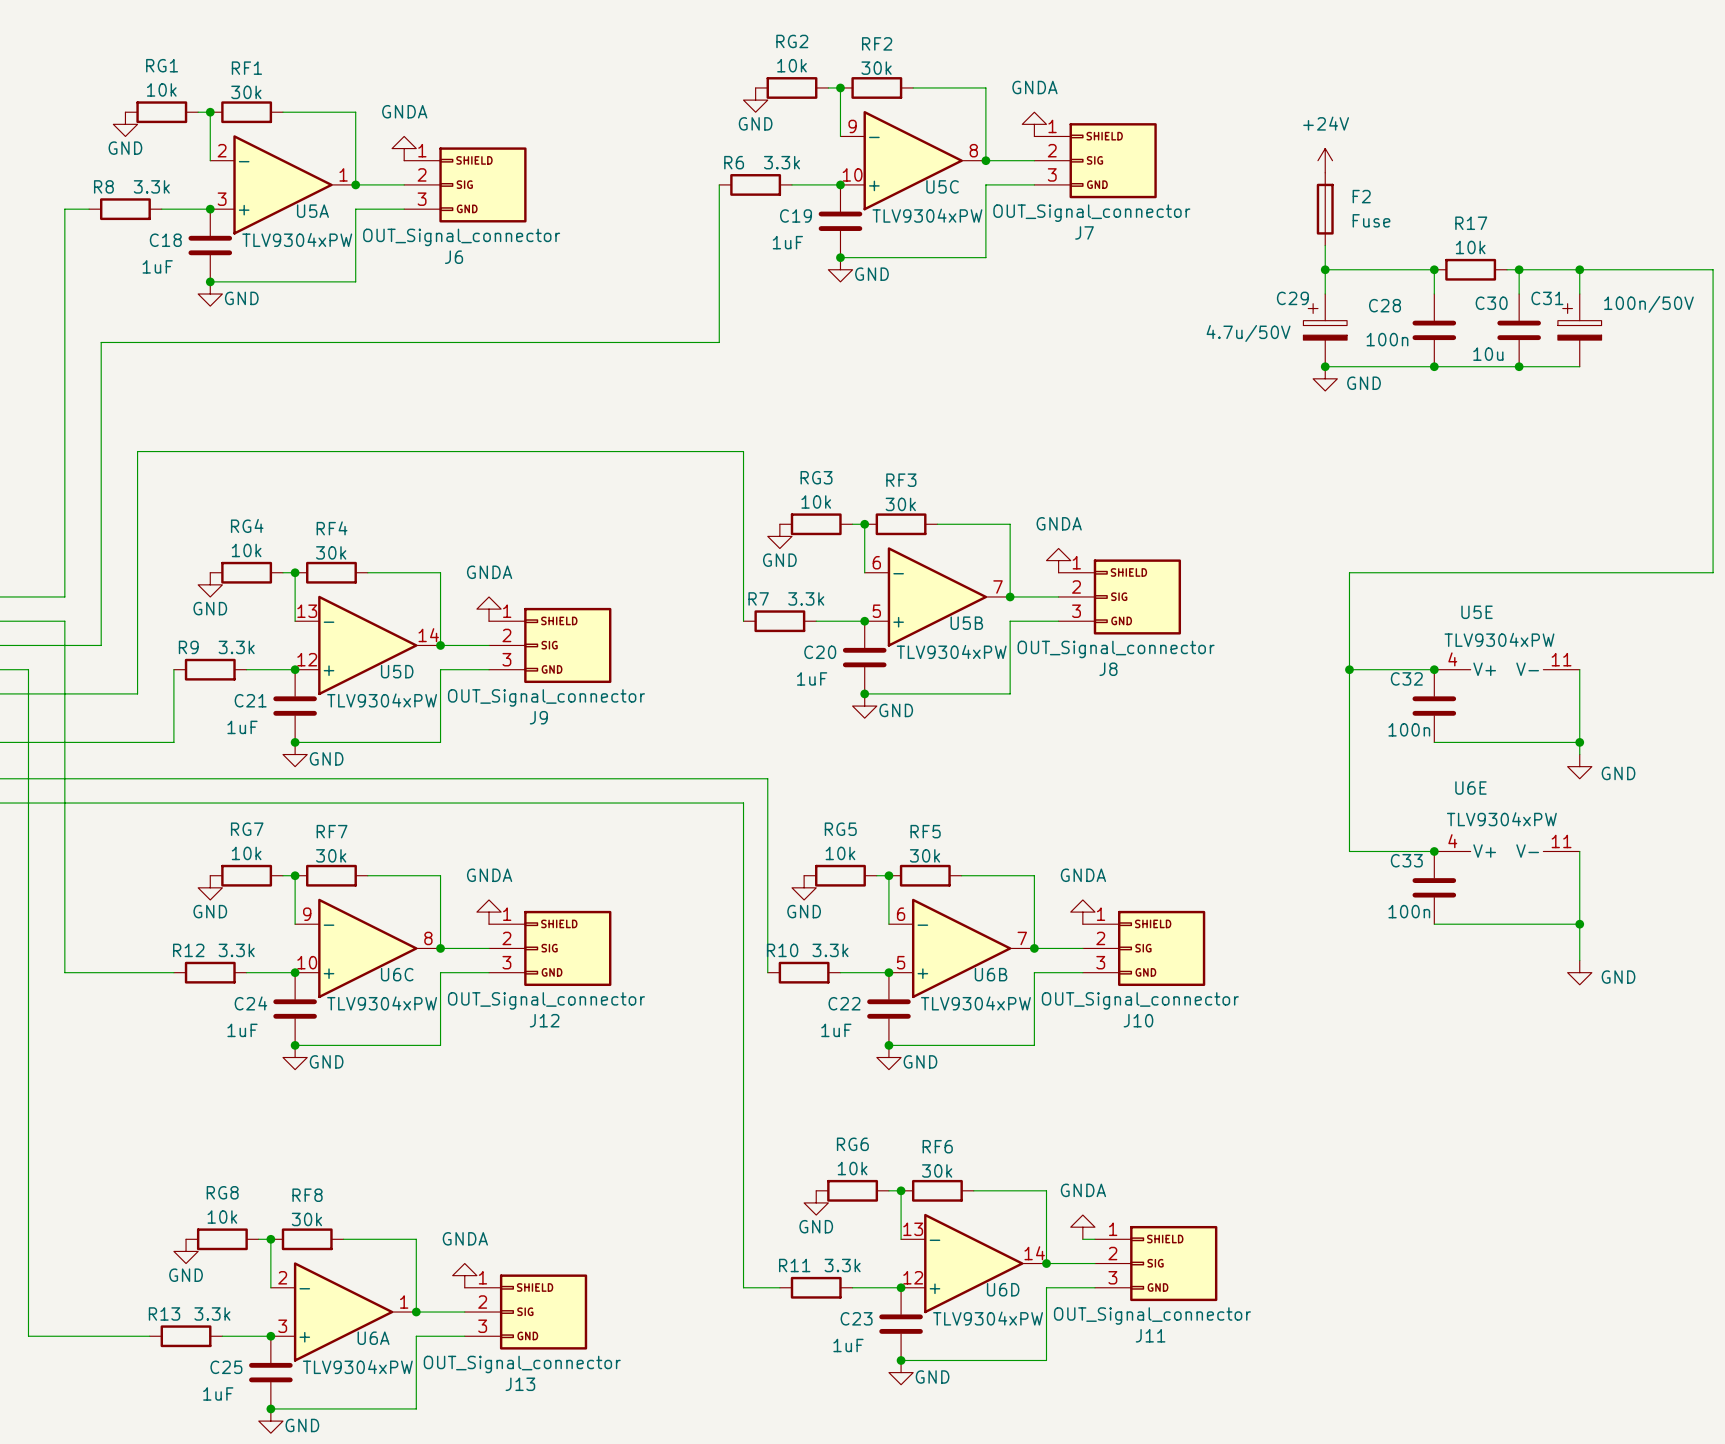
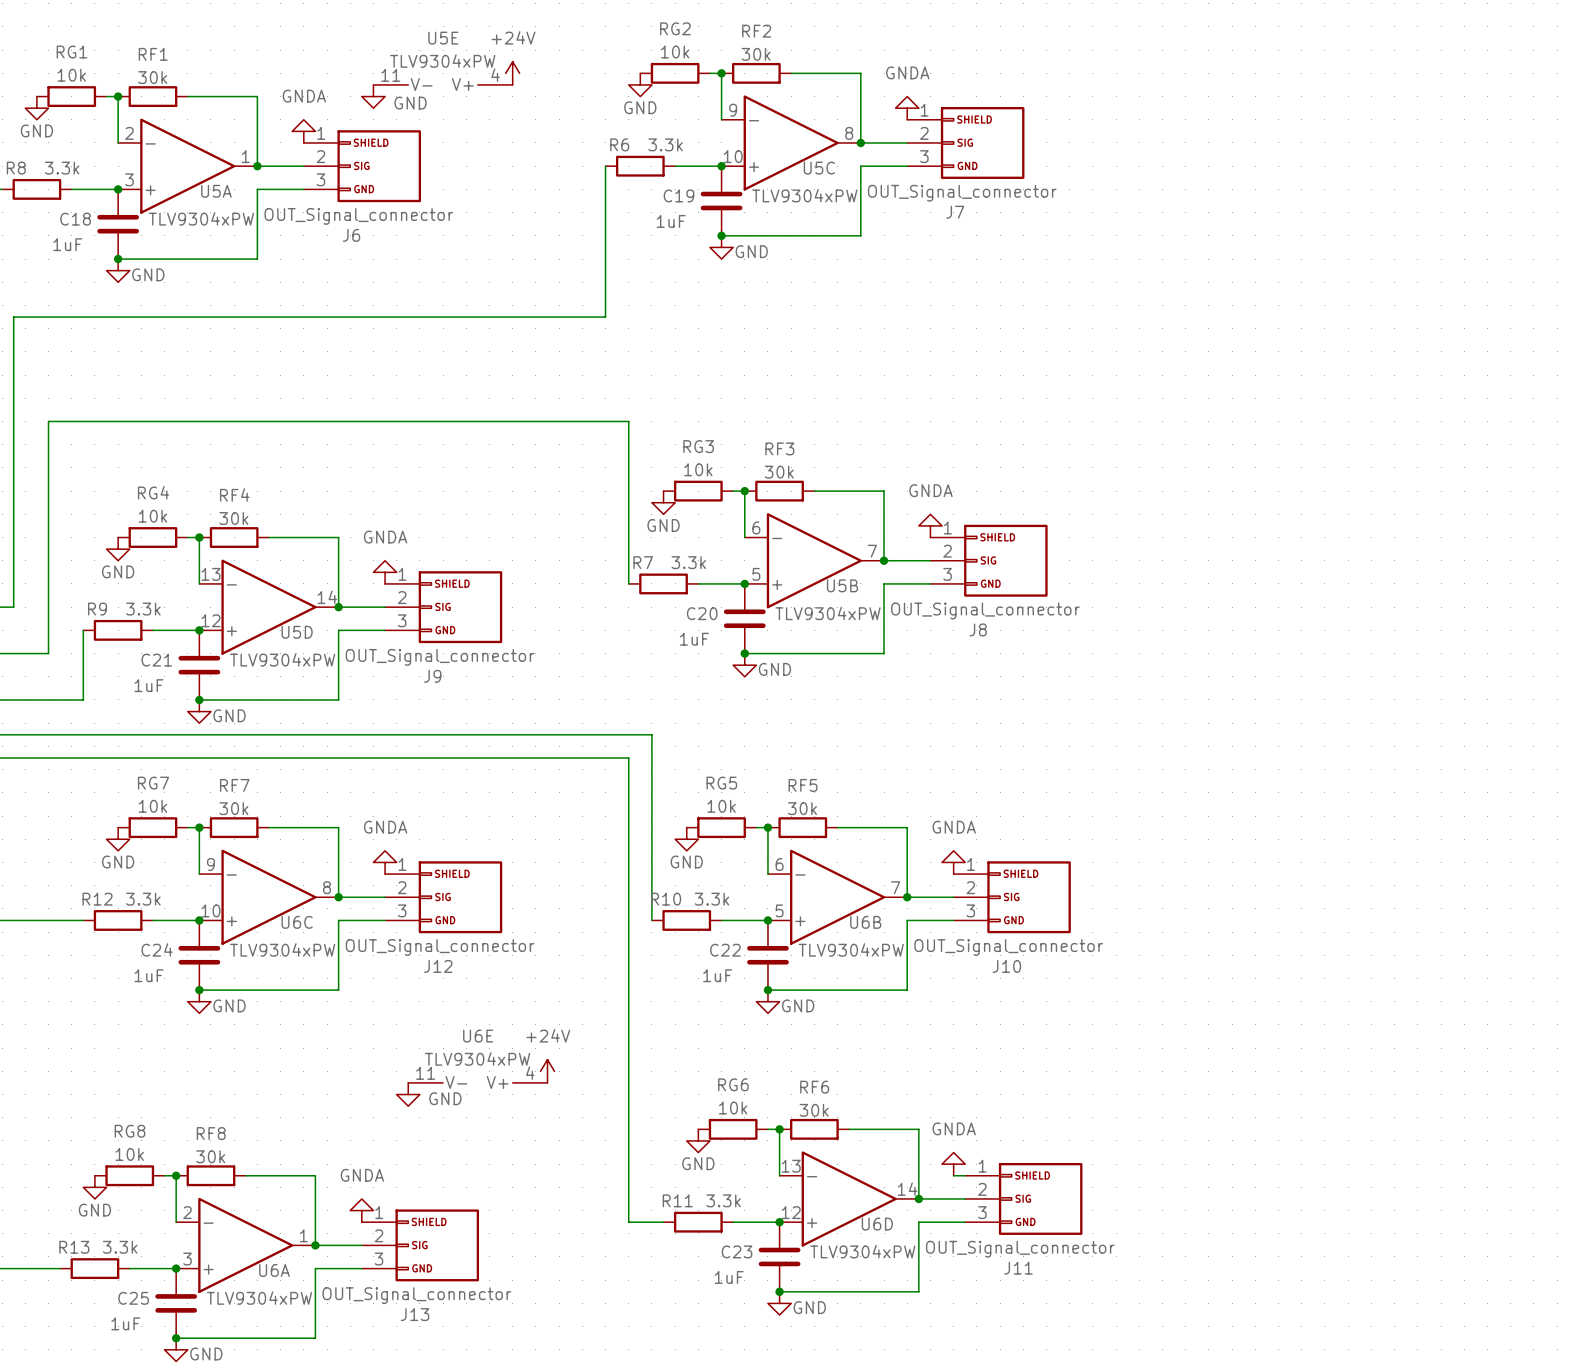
power symbol: none -> +24V (512, 73)
power symbol: none -> GND (373, 96)
power symbol: +24V (1325, 160) -> none
F2: Fuse (1325, 209) -> none
wire: (1325, 245) (1325, 294) -> none
wire: (1325, 269) (1434, 269) (1434, 294) -> none
junction: (1325, 269) -> none
junction: (1434, 269) -> none
R17: 10k (1470, 269) -> none
wire: (1507, 269) (1713, 269) (1713, 572) (1349, 572) (1349, 851) (1434, 851) -> none
wire: (1519, 269) (1519, 294) -> none
junction: (1519, 269) -> none
wire: (1579, 269) (1579, 294) -> none
junction: (1579, 269) -> none
C29: 4.7u/50V (1325, 330) -> none
C28: 100n (1434, 330) -> none
C30: 10u (1519, 330) -> none
C31: 100n/50V (1579, 330) -> none
wire: (1325, 366) (1579, 366) -> none
junction: (1325, 366) -> none
junction: (1434, 366) -> none
junction: (1519, 366) -> none
power symbol: GND (1325, 378) -> none
U5E name position: U5E (1477, 612) -> U5E (443, 38)
wire: (1349, 669) (1434, 669) -> none
junction: (1349, 669) -> none
junction: (1434, 669) -> none
U5E rotation: 0° (1507, 669) -> 180° (443, 84)
U5E position: (1507, 669) -> (443, 84)
wire: (1579, 669) (1579, 754) -> none
C32: 100n (1434, 706) -> none
wire: (1434, 742) (1579, 742) -> none
junction: (1579, 742) -> none
power symbol: GND (1579, 766) -> none
U6E name position: U6E (1470, 788) -> U6E (478, 1036)
junction: (1434, 851) -> none
U6E rotation: 0° (1507, 851) -> 180° (477, 1082)
U6E position: (1507, 851) -> (477, 1082)
wire: (1579, 851) (1579, 960) -> none
C33: 100n (1434, 887) -> none
wire: (1434, 924) (1579, 924) -> none
junction: (1579, 924) -> none
power symbol: GND (1579, 972) -> none
power symbol: none -> +24V (547, 1071)
power symbol: none -> GND (408, 1094)

